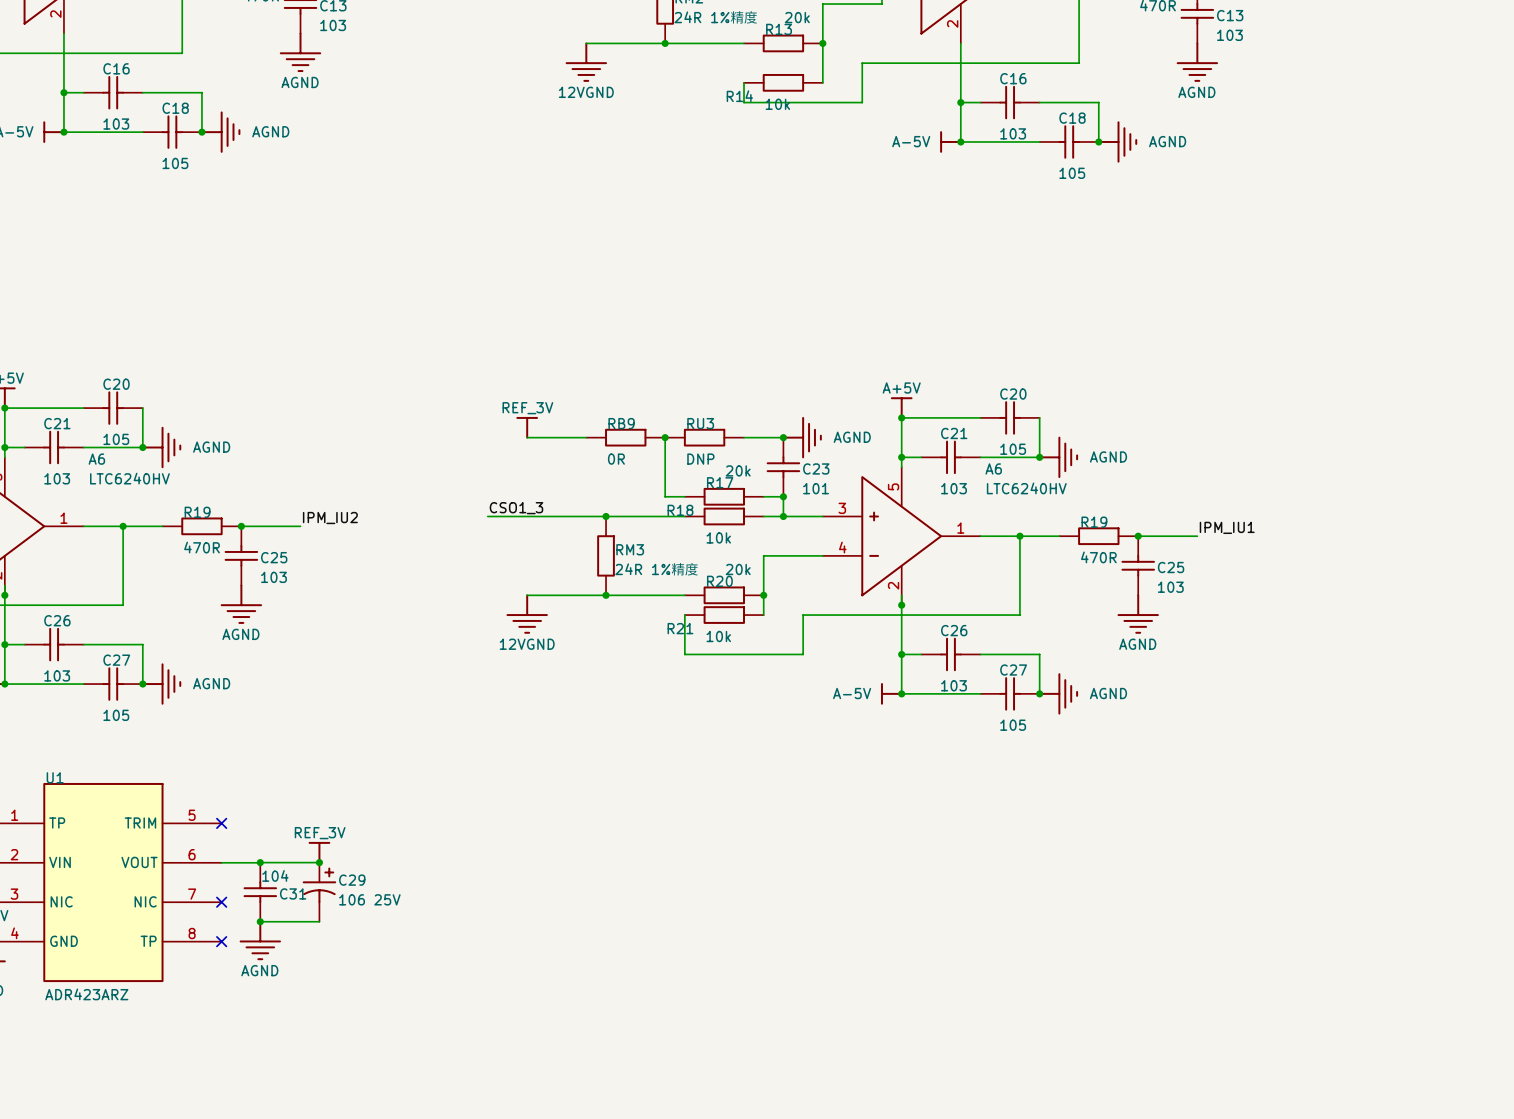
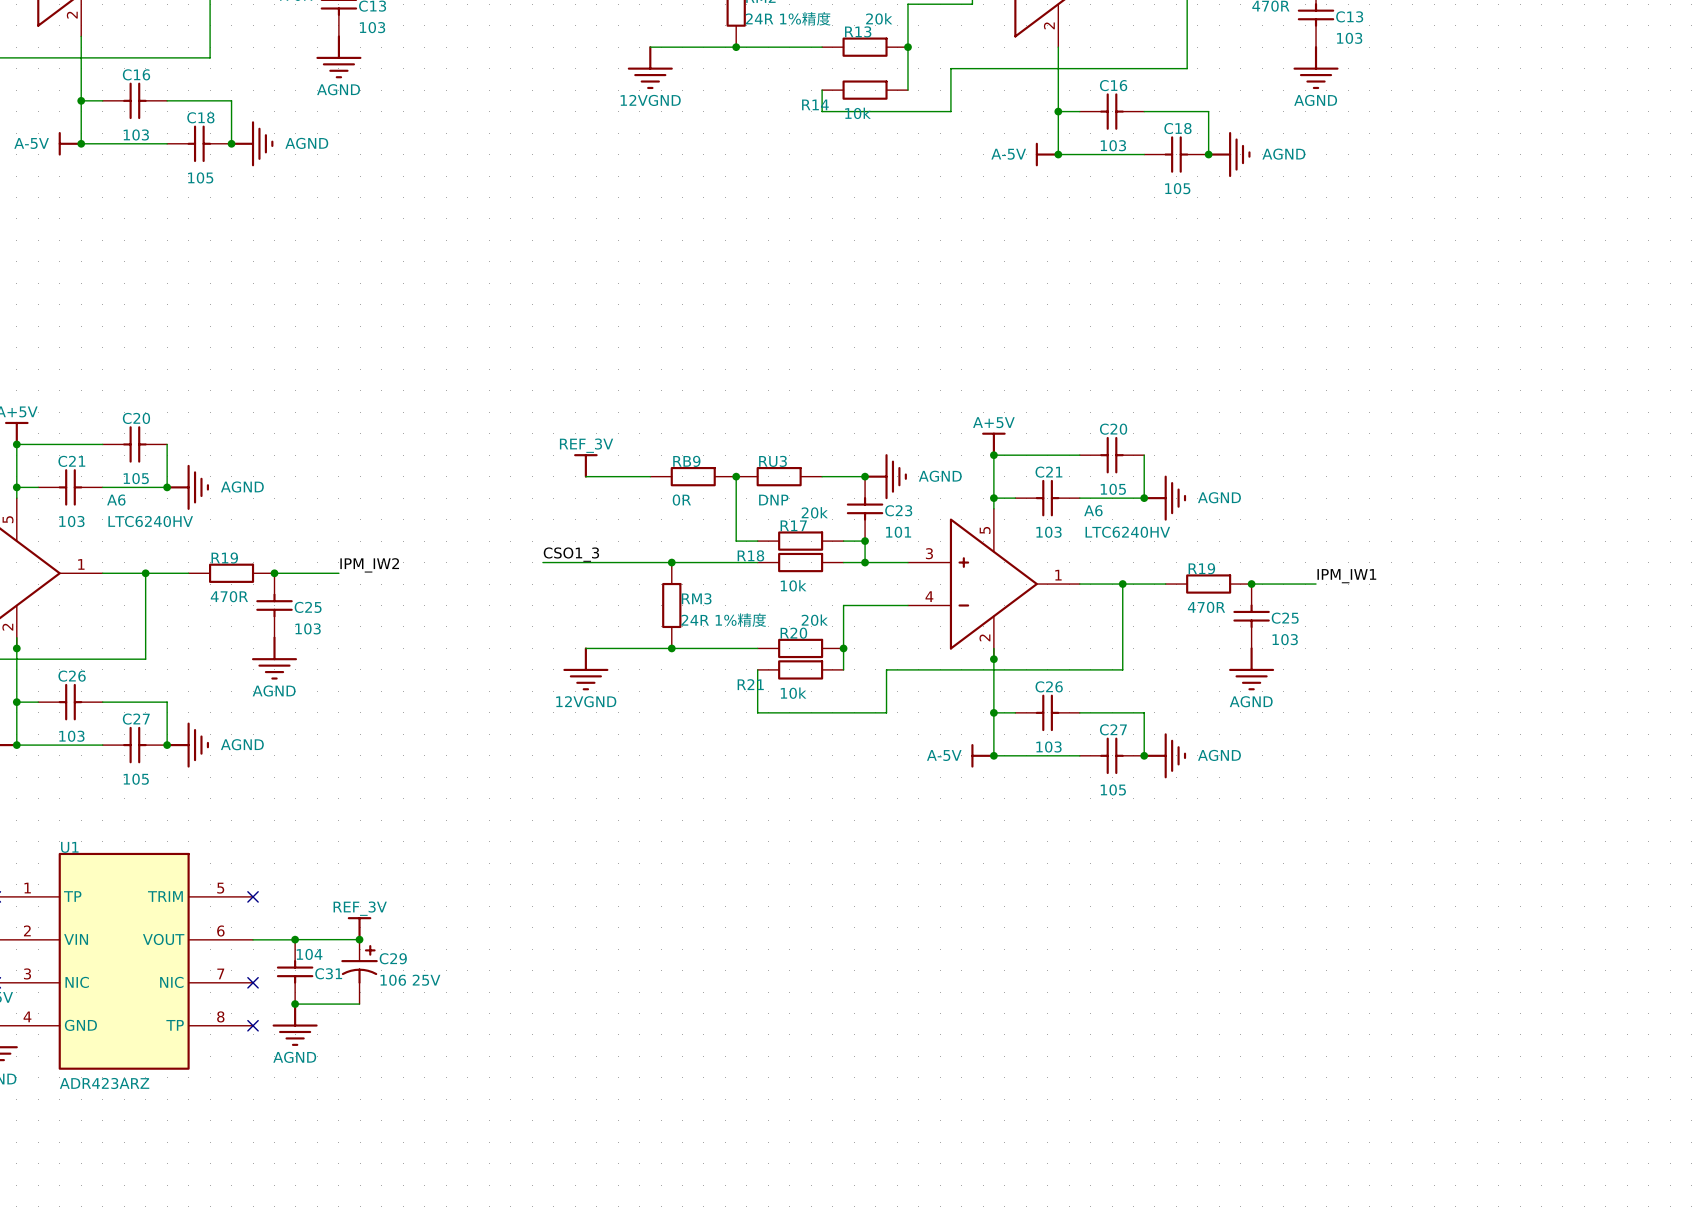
label: IPM_IU2 (330, 518) -> IPM_IW2 (369, 565)
label: IPM_IU1 (1227, 527) -> IPM_IW1 (1346, 576)

